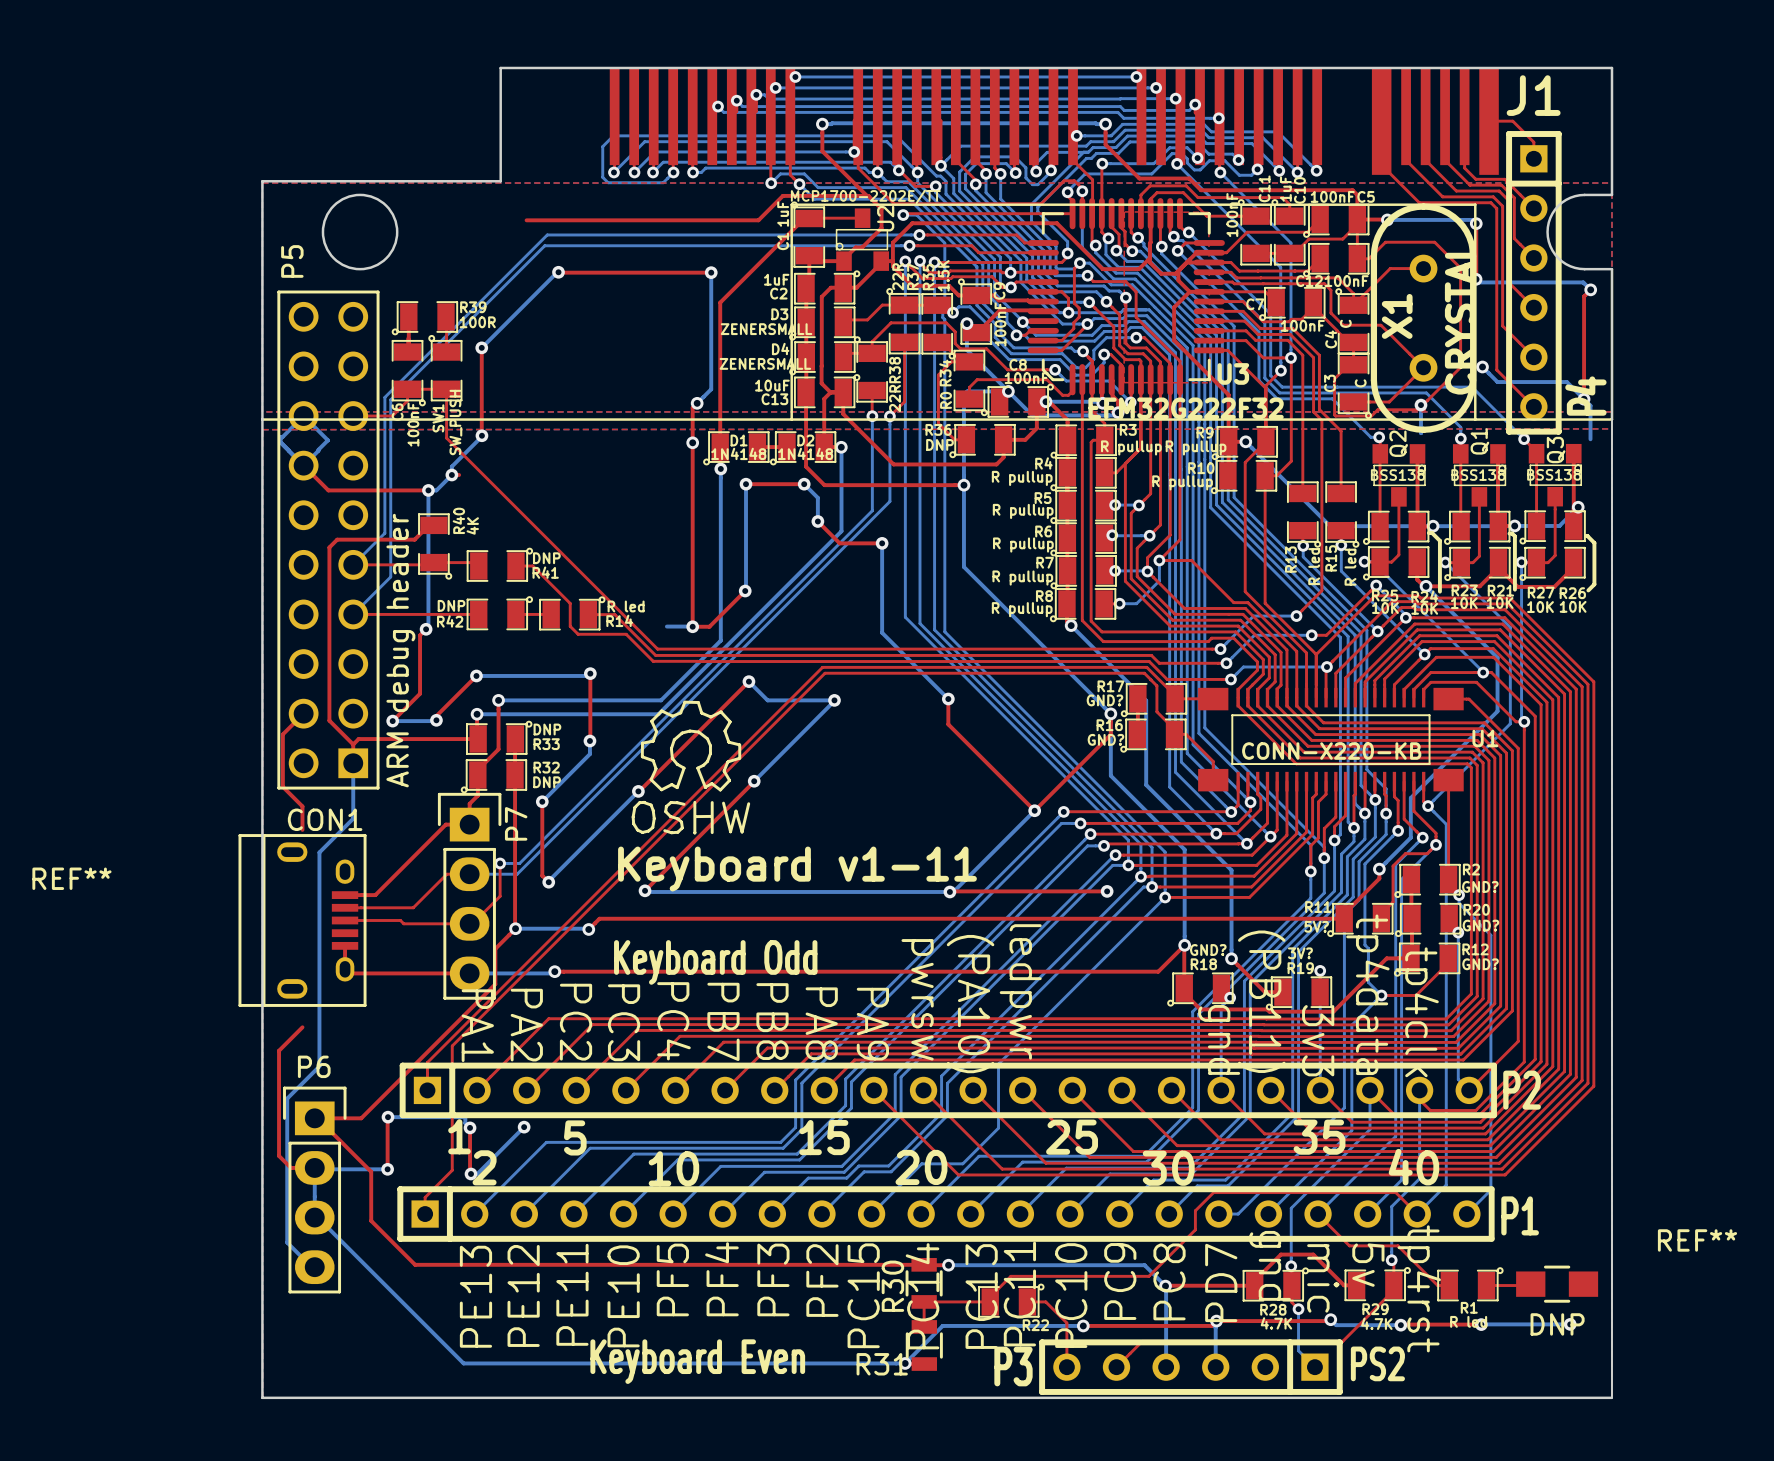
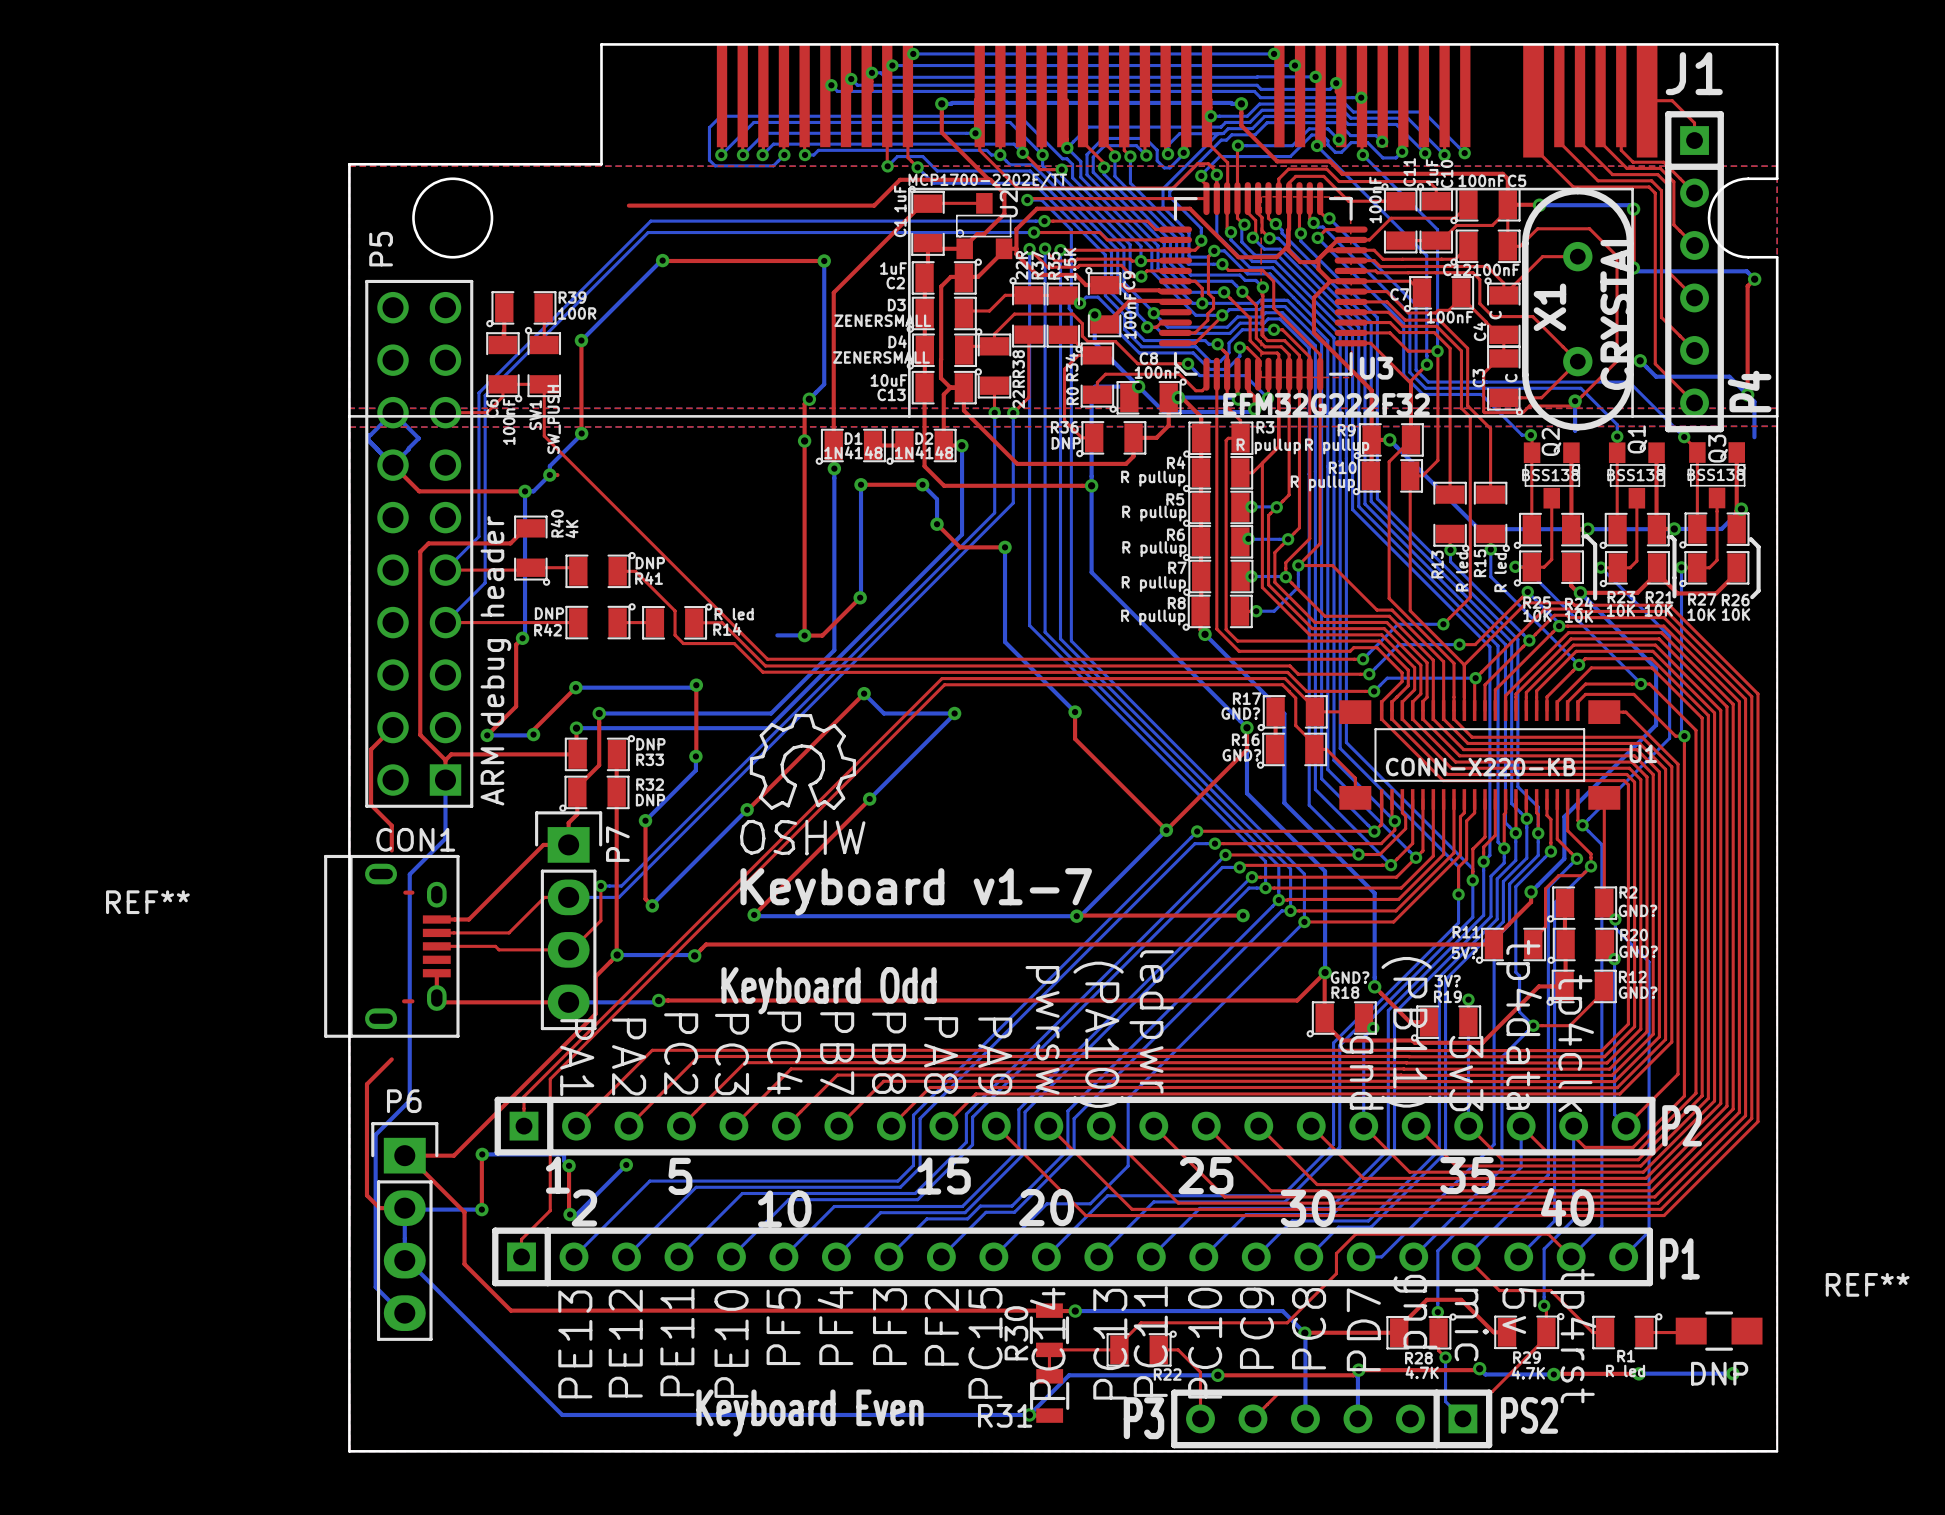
top track: none -> (405, 892) (412, 892)
text: Keyboard v1-11 (797, 869) -> Keyboard v1-7 (916, 891)
top track: none -> (404, 1001) (412, 1001)

